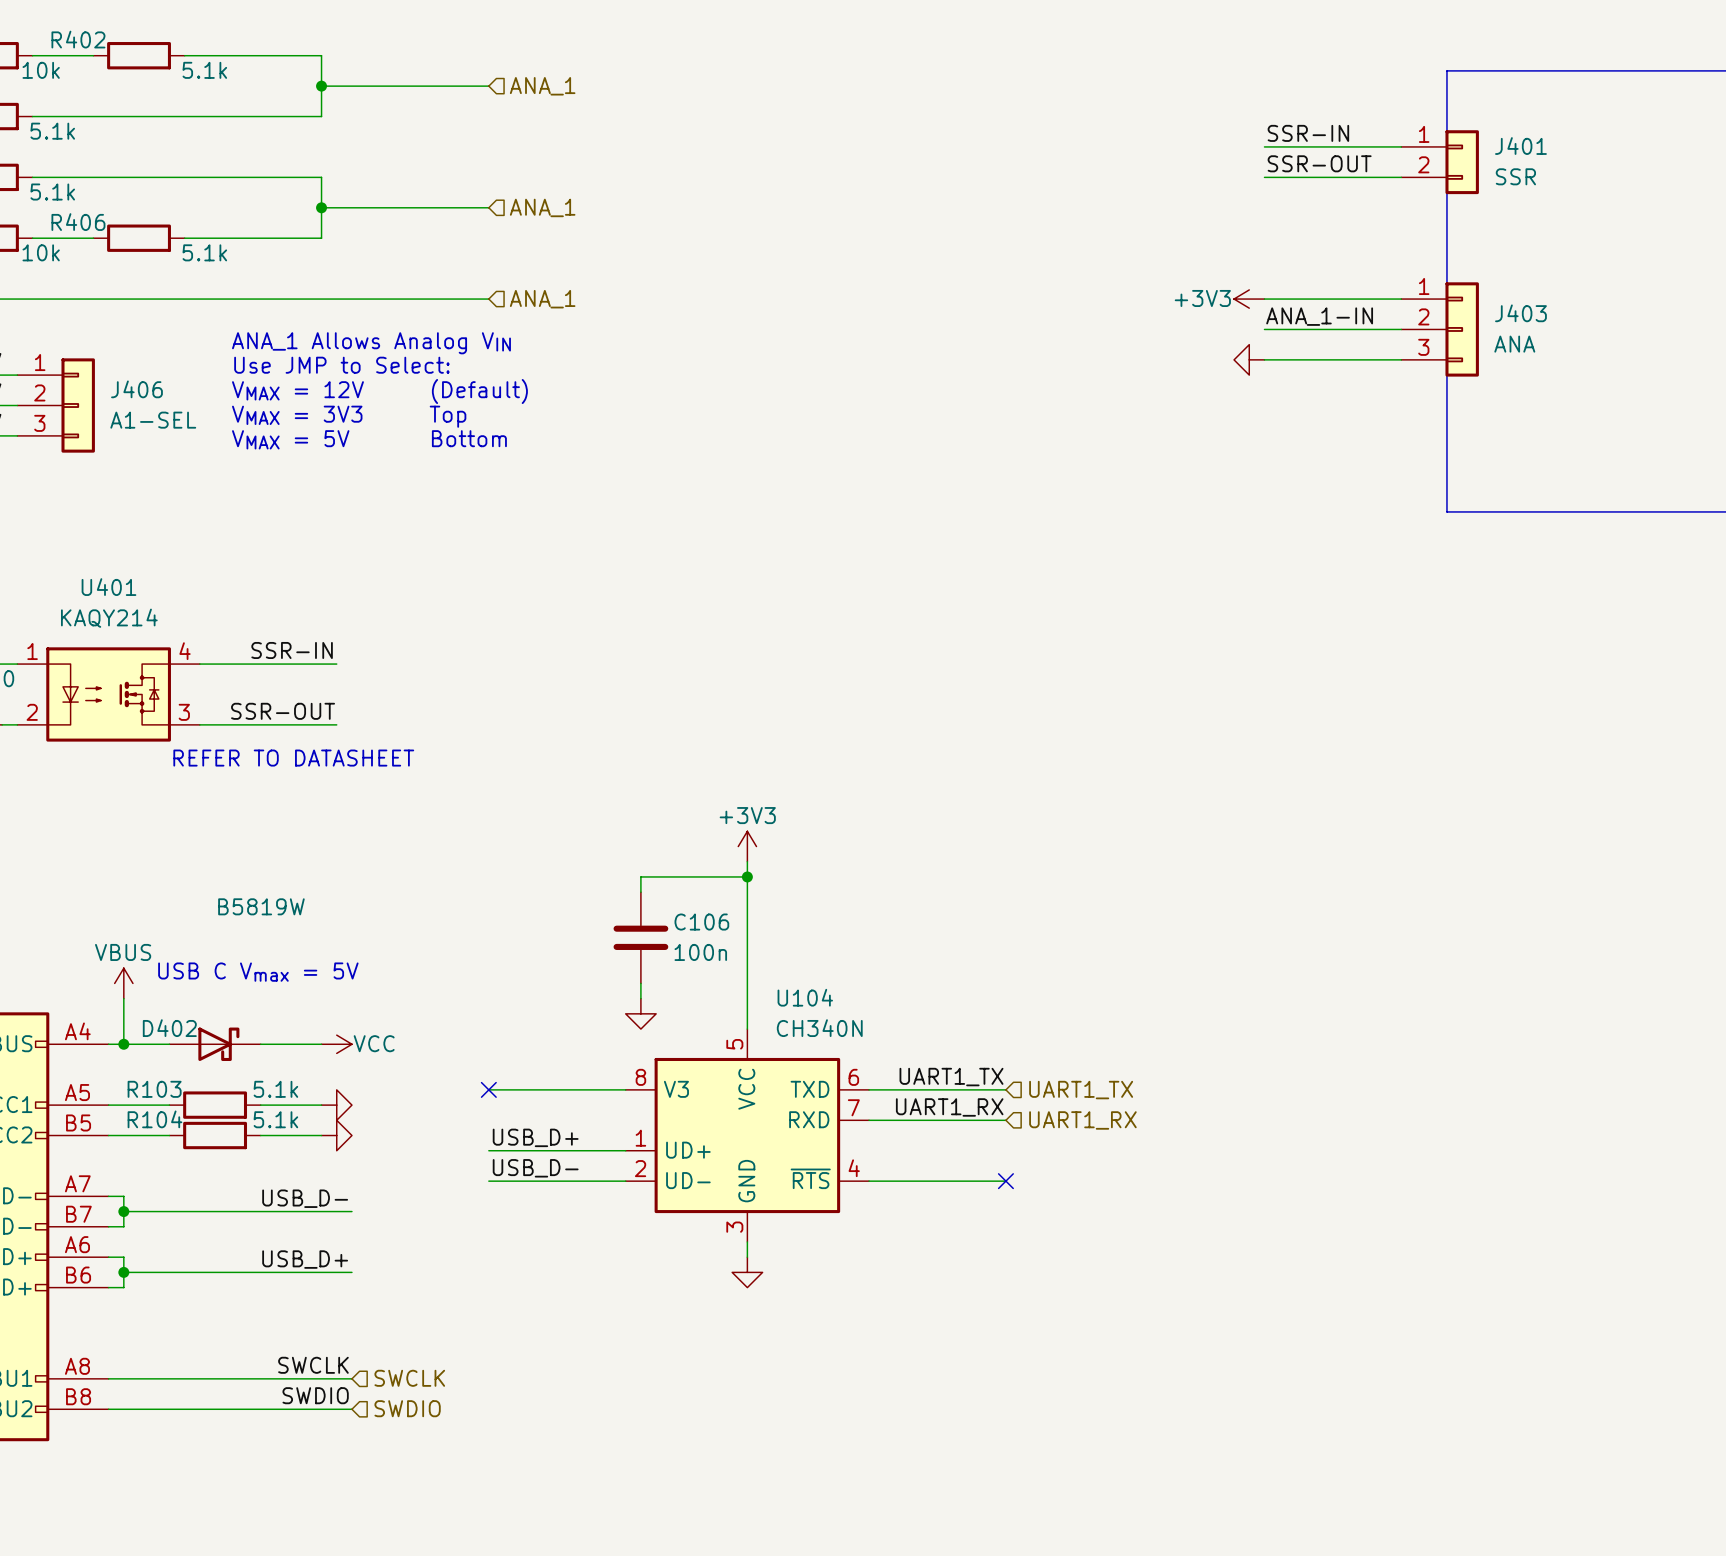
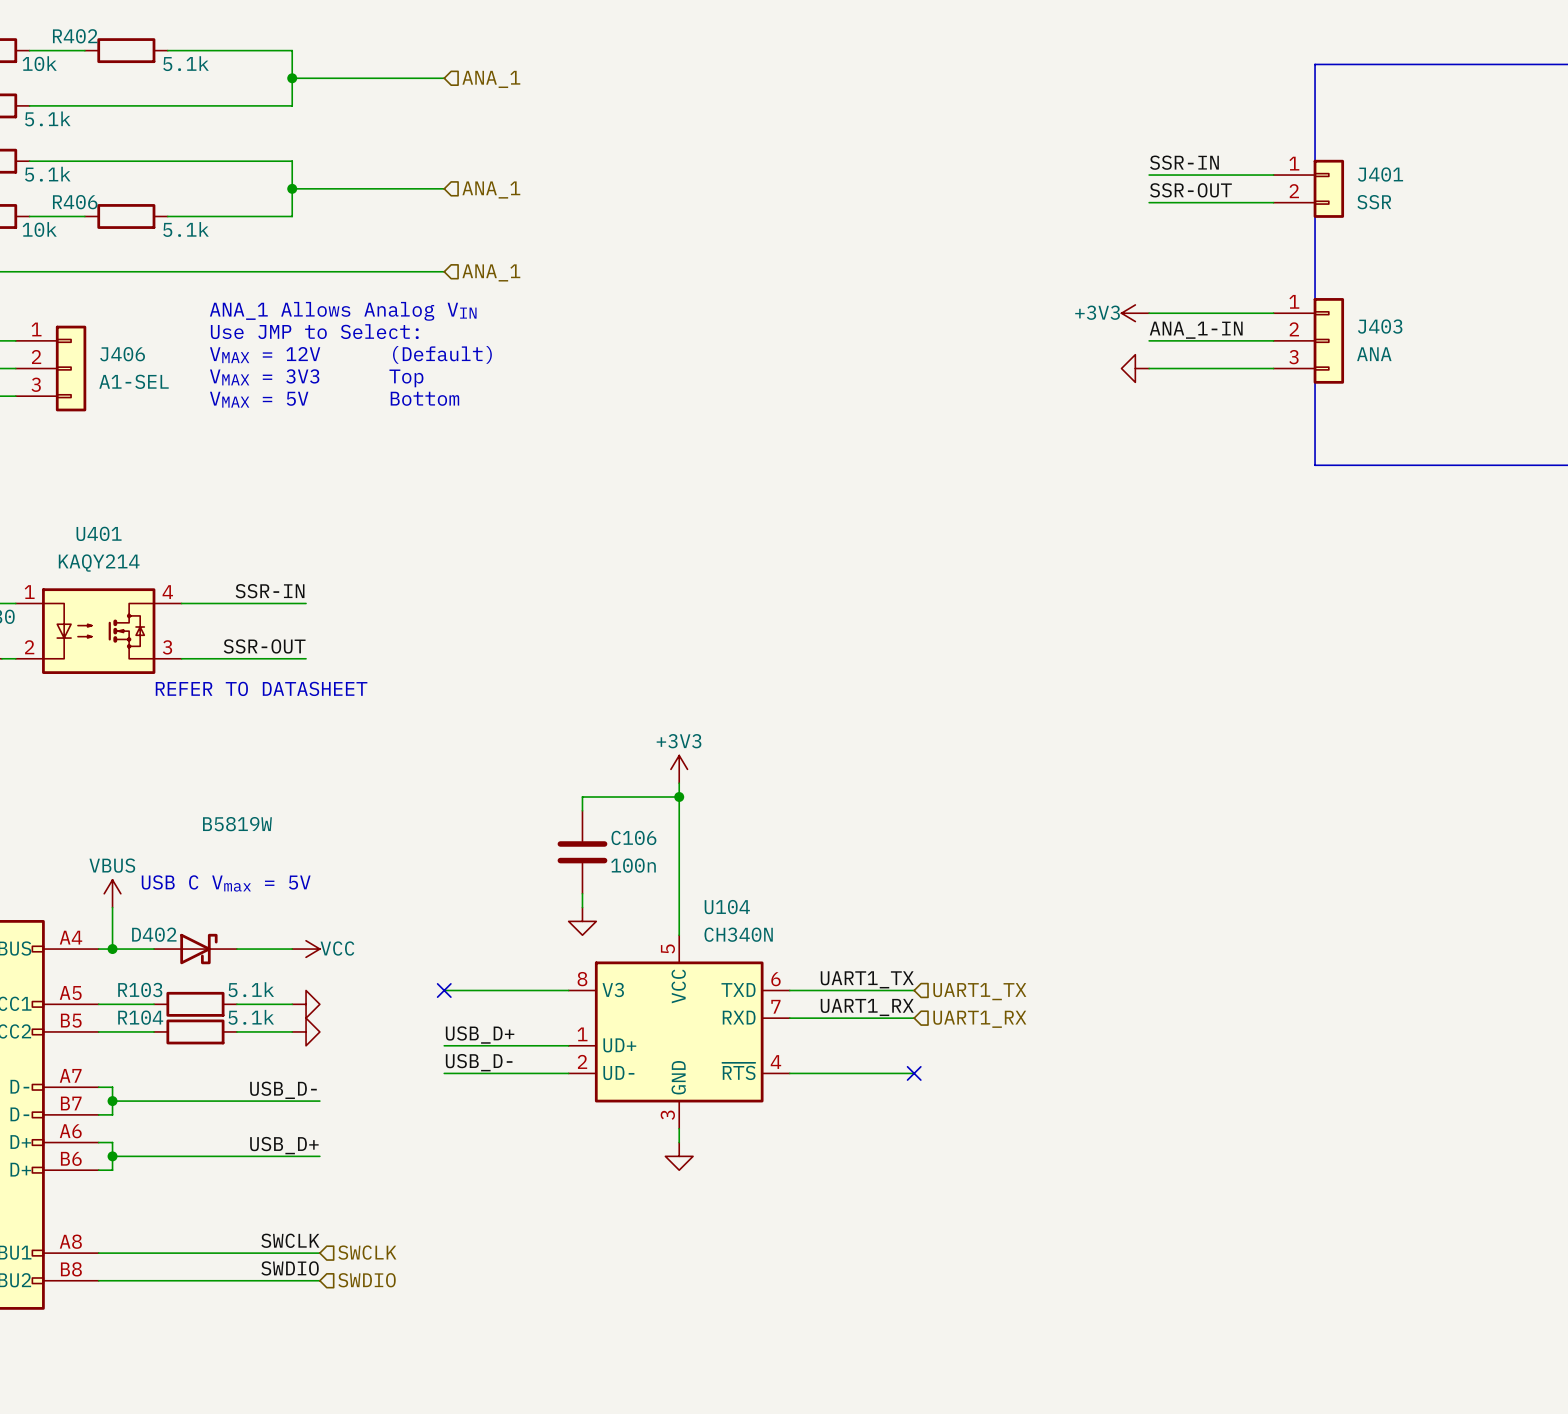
label position: SSR-IN (1308, 133) -> SSR-IN (1184, 162)
wire: (1264, 146) (1401, 146) -> (1149, 175) (1273, 175)
J401 position: (1440, 162) -> (1308, 188)
label position: SSR-OUT (1319, 163) -> SSR-OUT (1190, 190)
wire: (1264, 177) (1401, 177) -> (1149, 202) (1273, 202)
power symbol position: +3V3 (1249, 299) -> +3V3 (1135, 313)
wire: (1264, 299) (1401, 299) -> (1149, 313) (1273, 313)
label position: ANA_1-IN (1319, 316) -> ANA_1-IN (1196, 330)
wire: (1264, 329) (1401, 329) -> (1149, 340) (1273, 340)
J403 position: (1440, 329) -> (1308, 340)
power symbol position: (1249, 359) -> (1135, 368)
wire: (1264, 359) (1401, 359) -> (1149, 368) (1273, 368)

